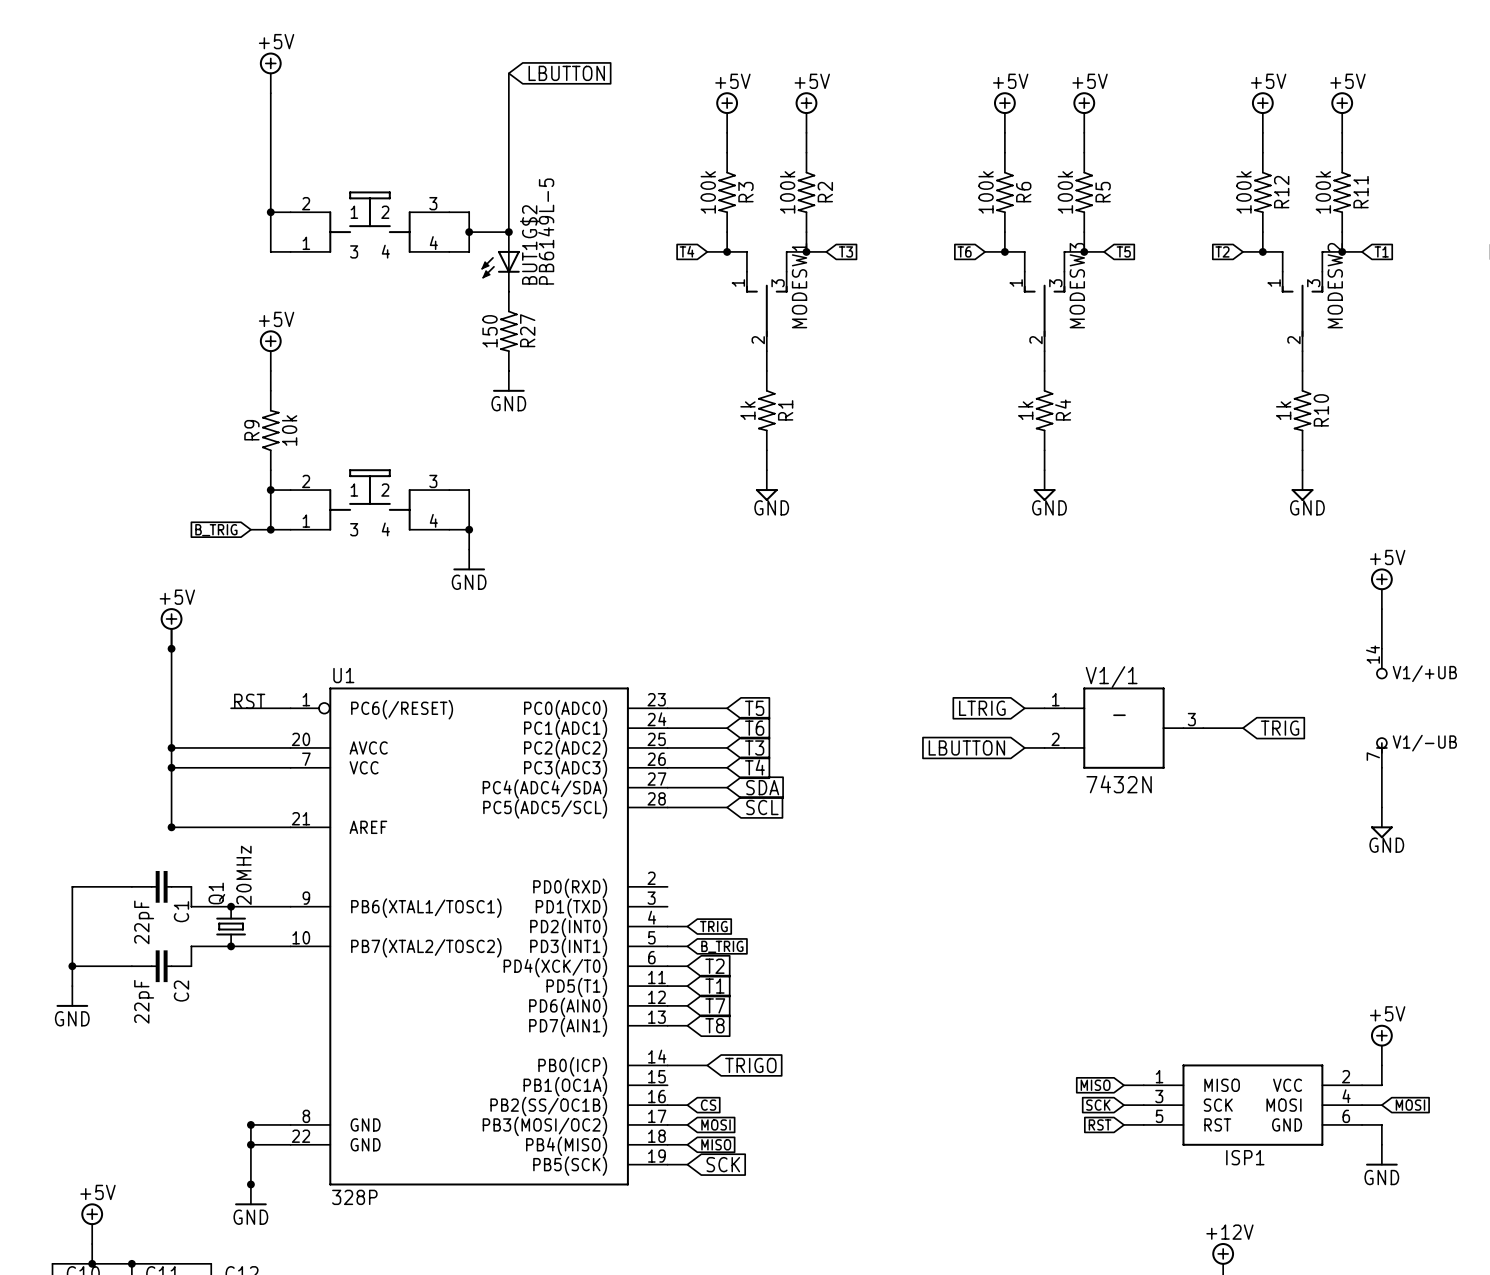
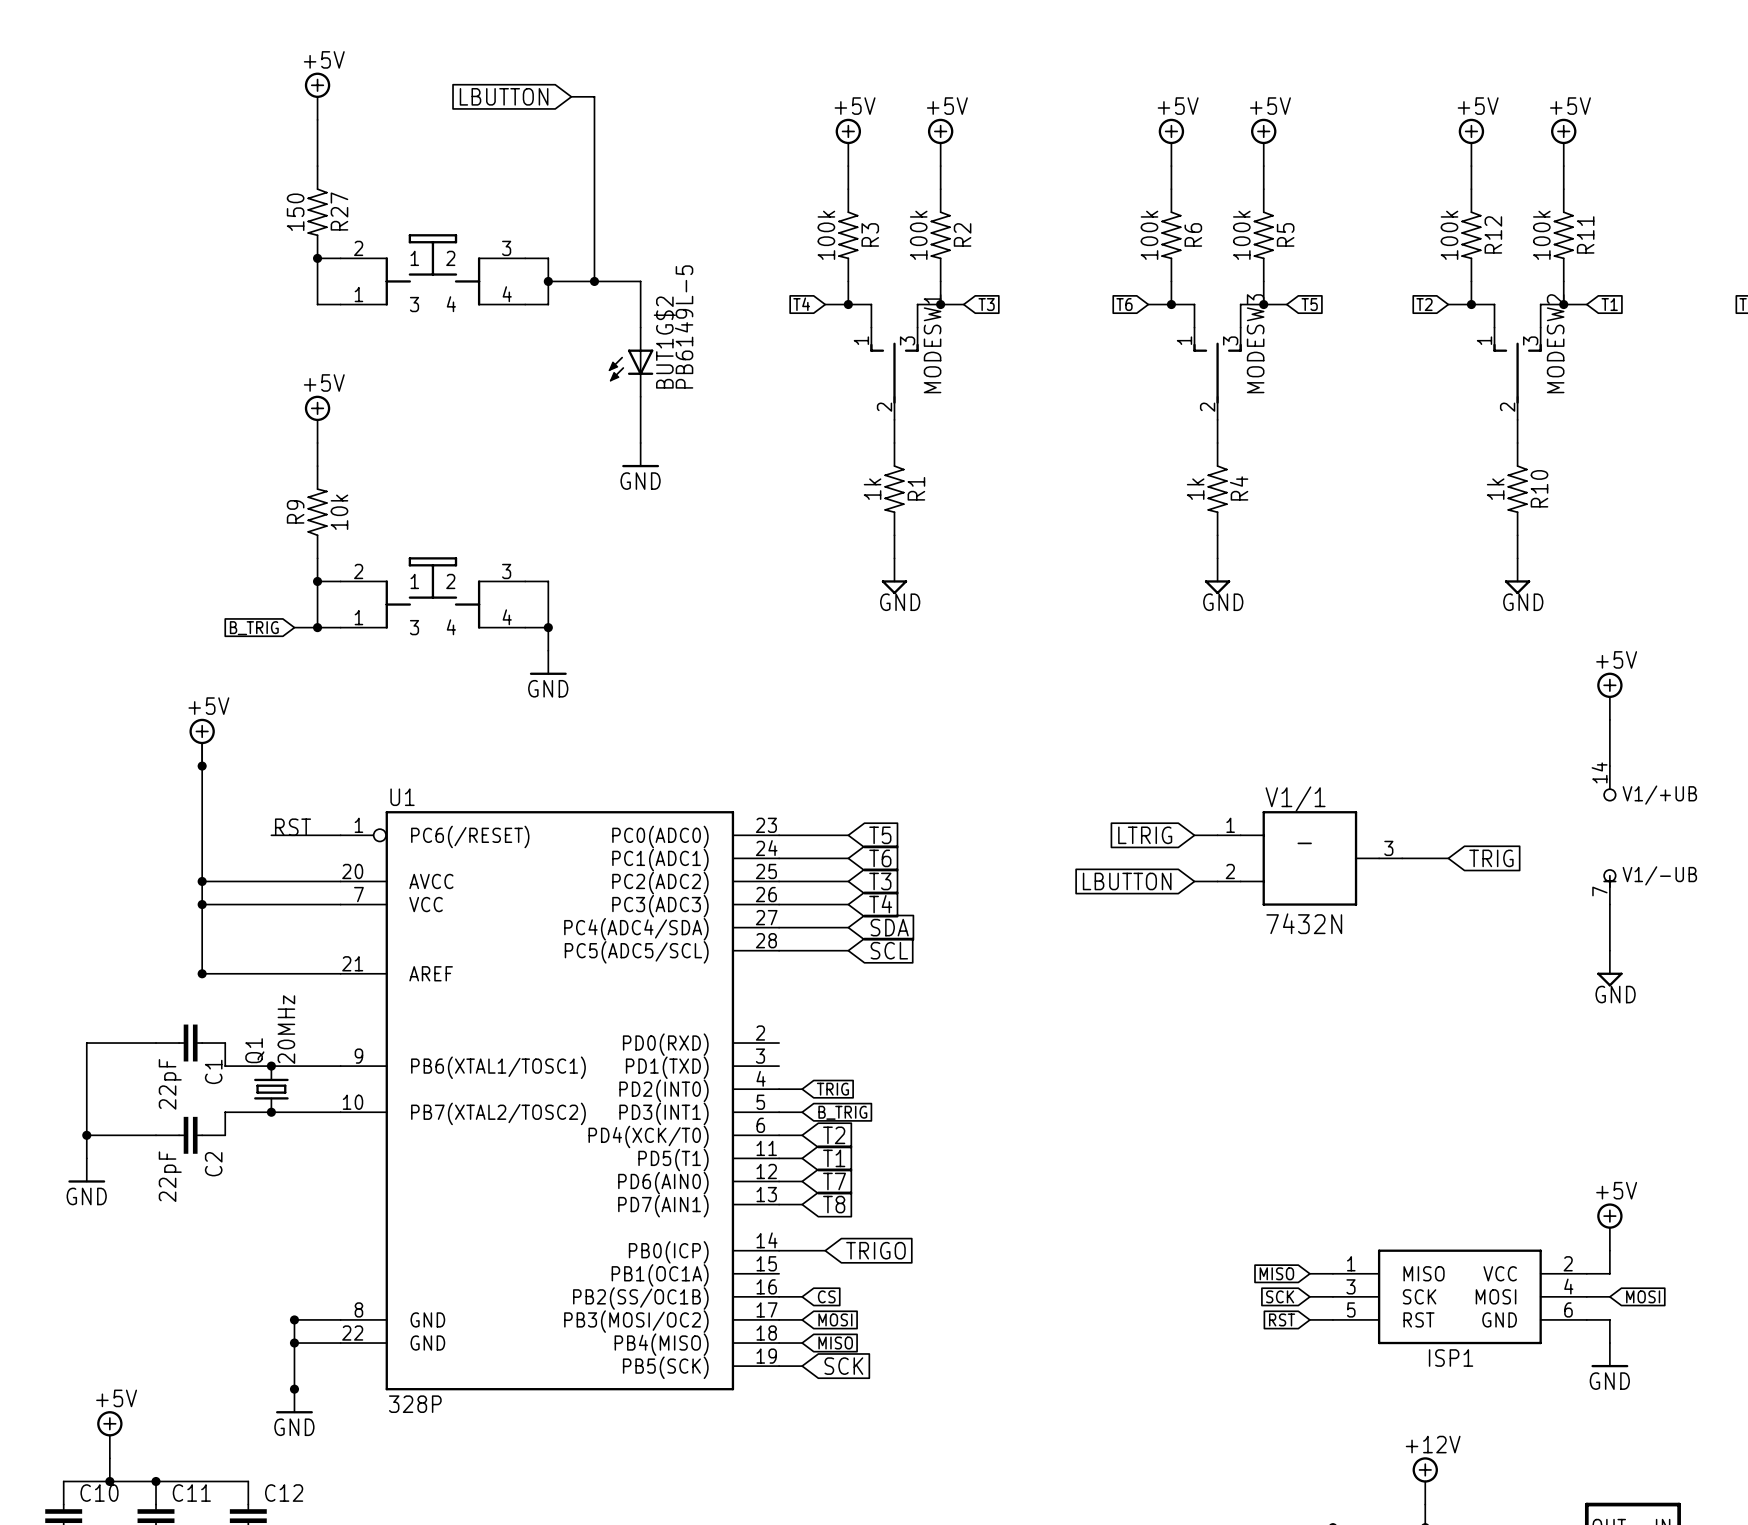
wire: none -> (571, 96) (594, 96)
global label rotation: 0° (566, 73) -> 180° (504, 96)
global label position: LBUTTON (566, 73) -> LBUTTON (504, 96)
wire: none -> (594, 281) (640, 281) (640, 327)
BUT1G$2 position: (500, 261) -> (631, 362)
R27 position: (508, 331) -> (317, 212)
wire: none -> (640, 396) (640, 442)
power symbol position: GND (508, 381) -> GND (640, 455)

